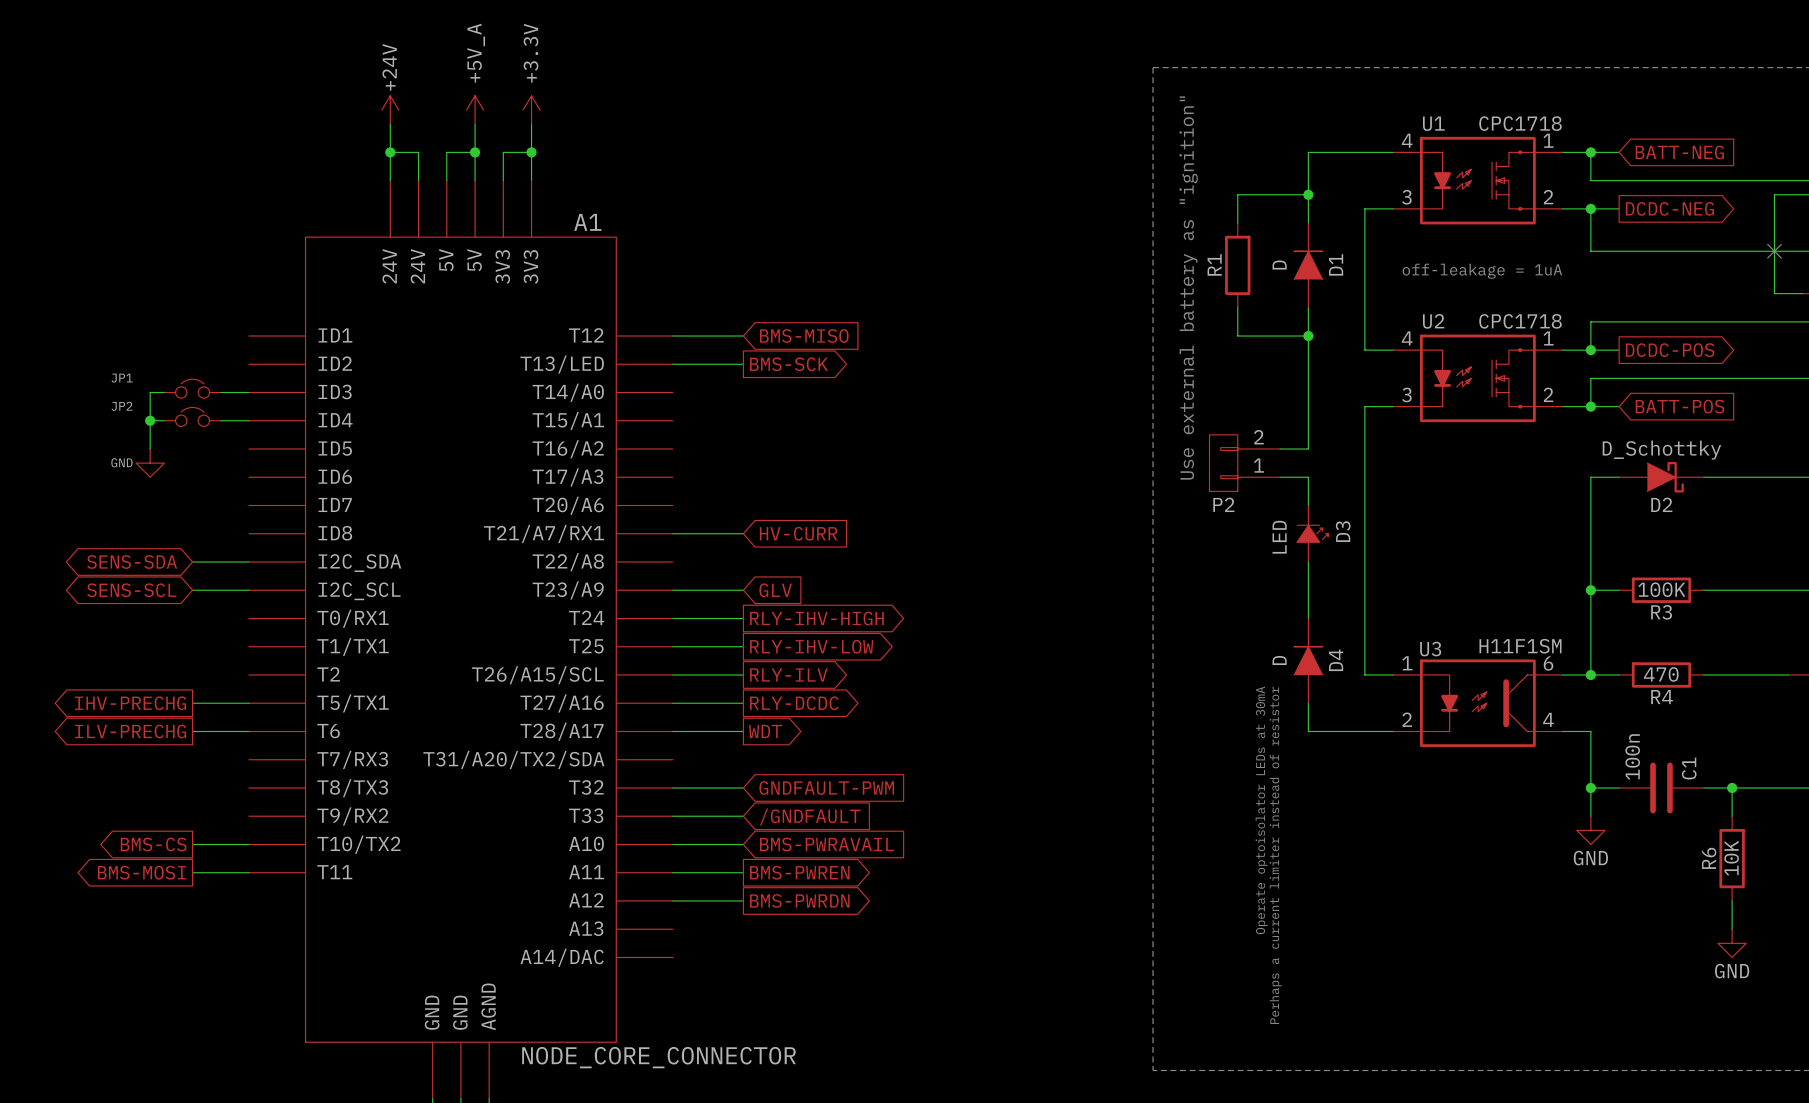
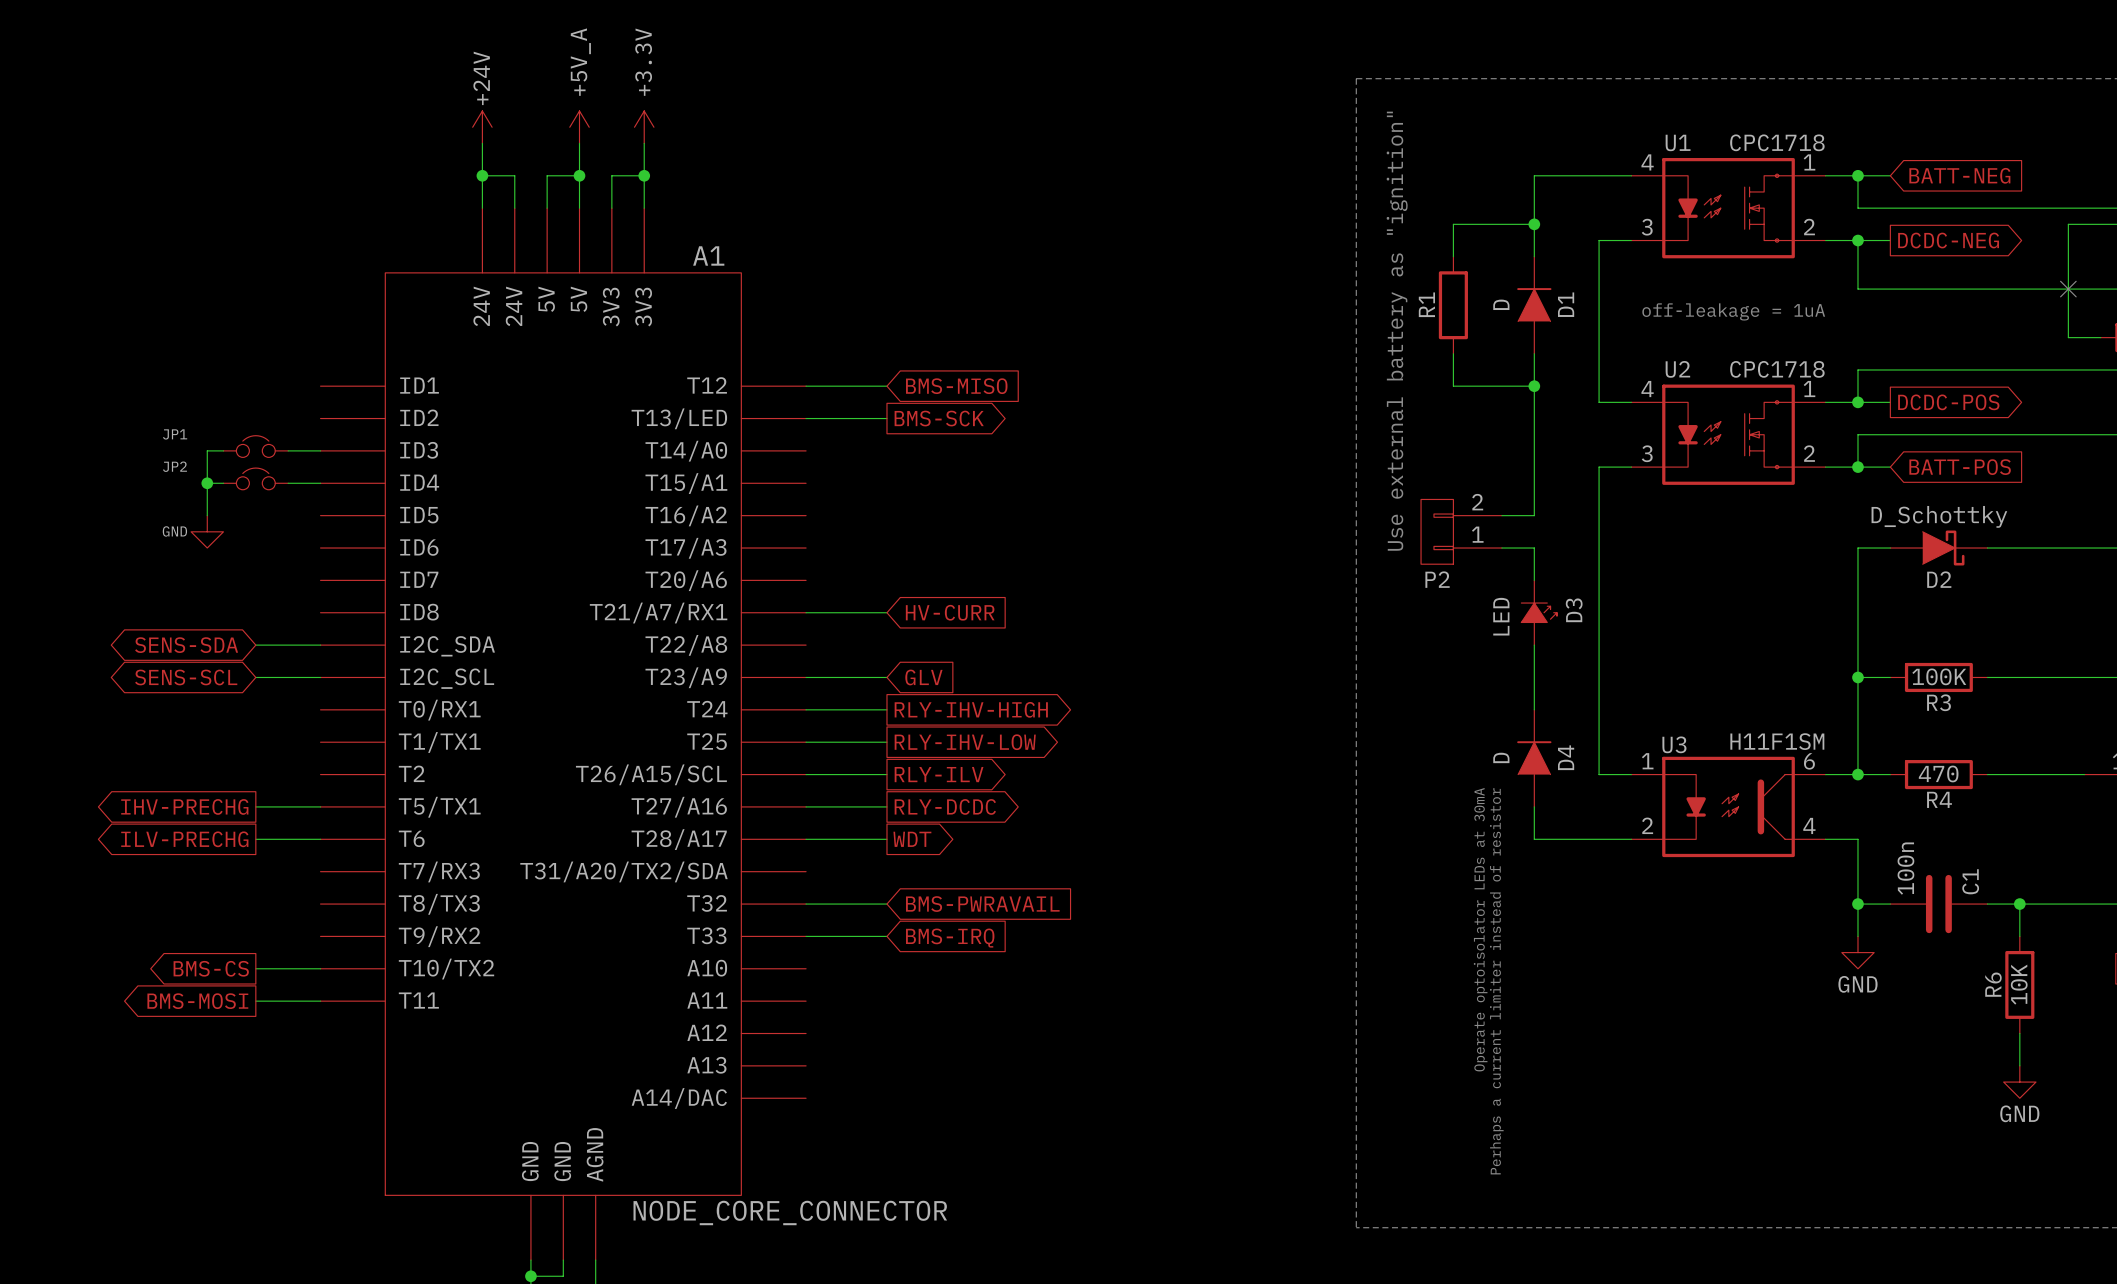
global label: GNDFAULT-PWM (826, 787) -> BMS-PWRAVAIL (982, 904)
global label: /GNDFAULT (810, 816) -> BMS-IRQ (950, 938)
wire: (672, 844) (743, 844) -> none
global label: BMS-PWRAVAIL (827, 844) -> none
wire: (672, 872) (743, 872) -> none
global label: BMS-PWREN (799, 872) -> none
wire: (672, 900) (743, 900) -> none
global label: BMS-PWRDN (799, 900) -> none

